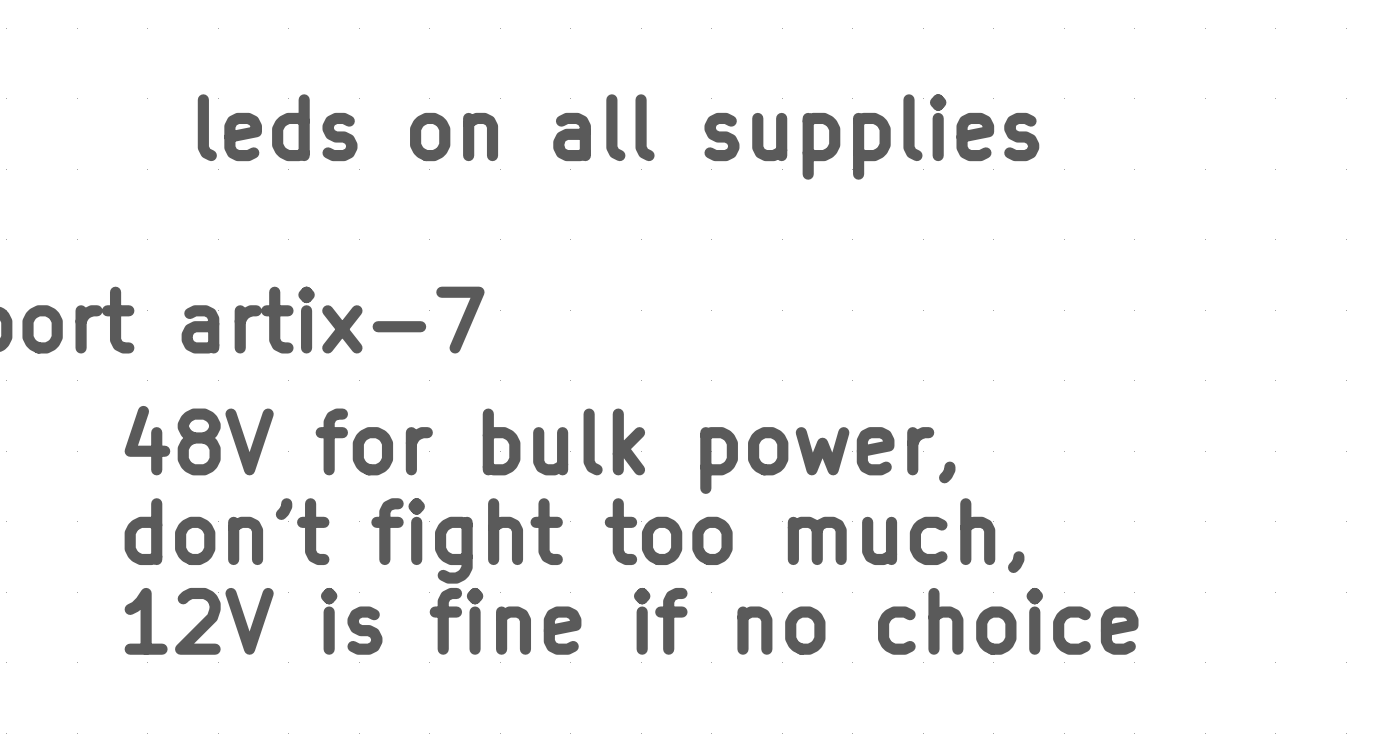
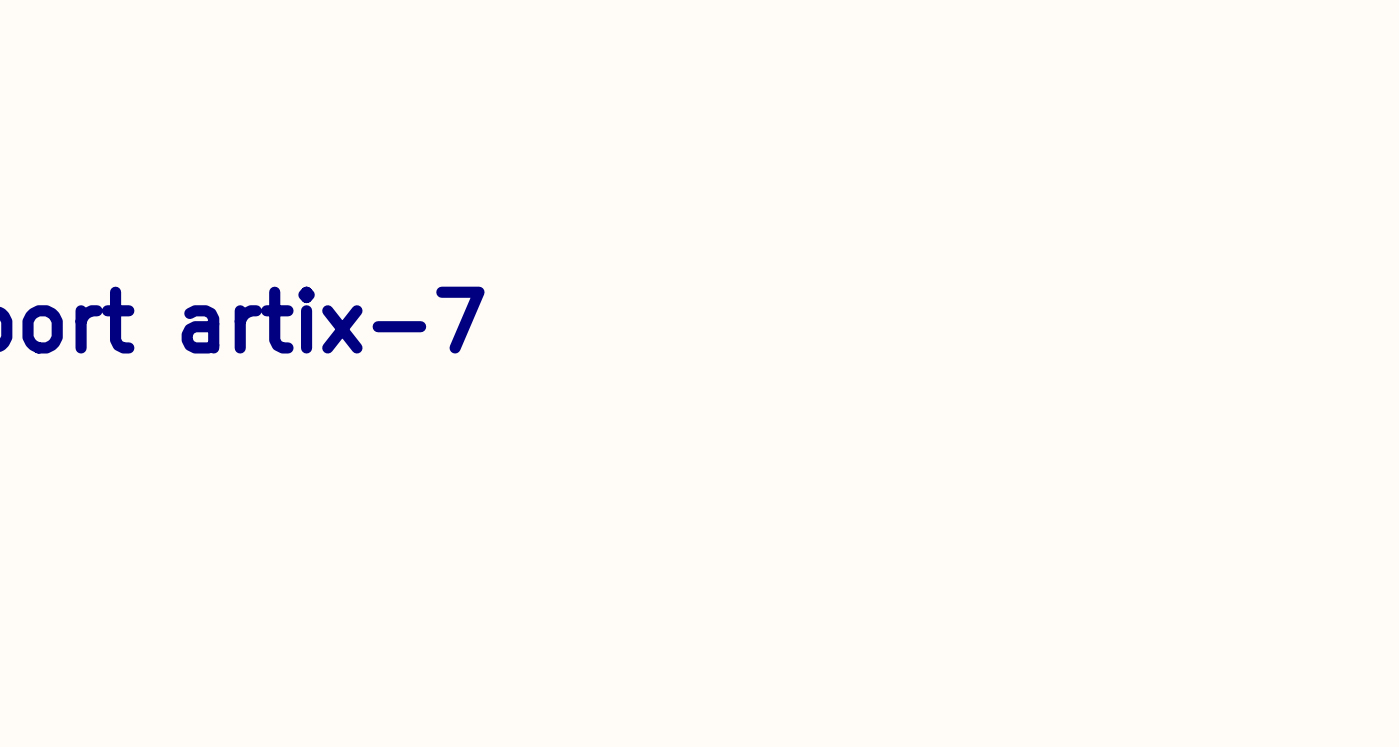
text: leds on all supplies (618, 137) -> none
text: 48V for bulk power, (540, 449) -> none
text: don’t fight too much, (574, 540) -> none
text: 12V is fine if no choice (631, 621) -> none

